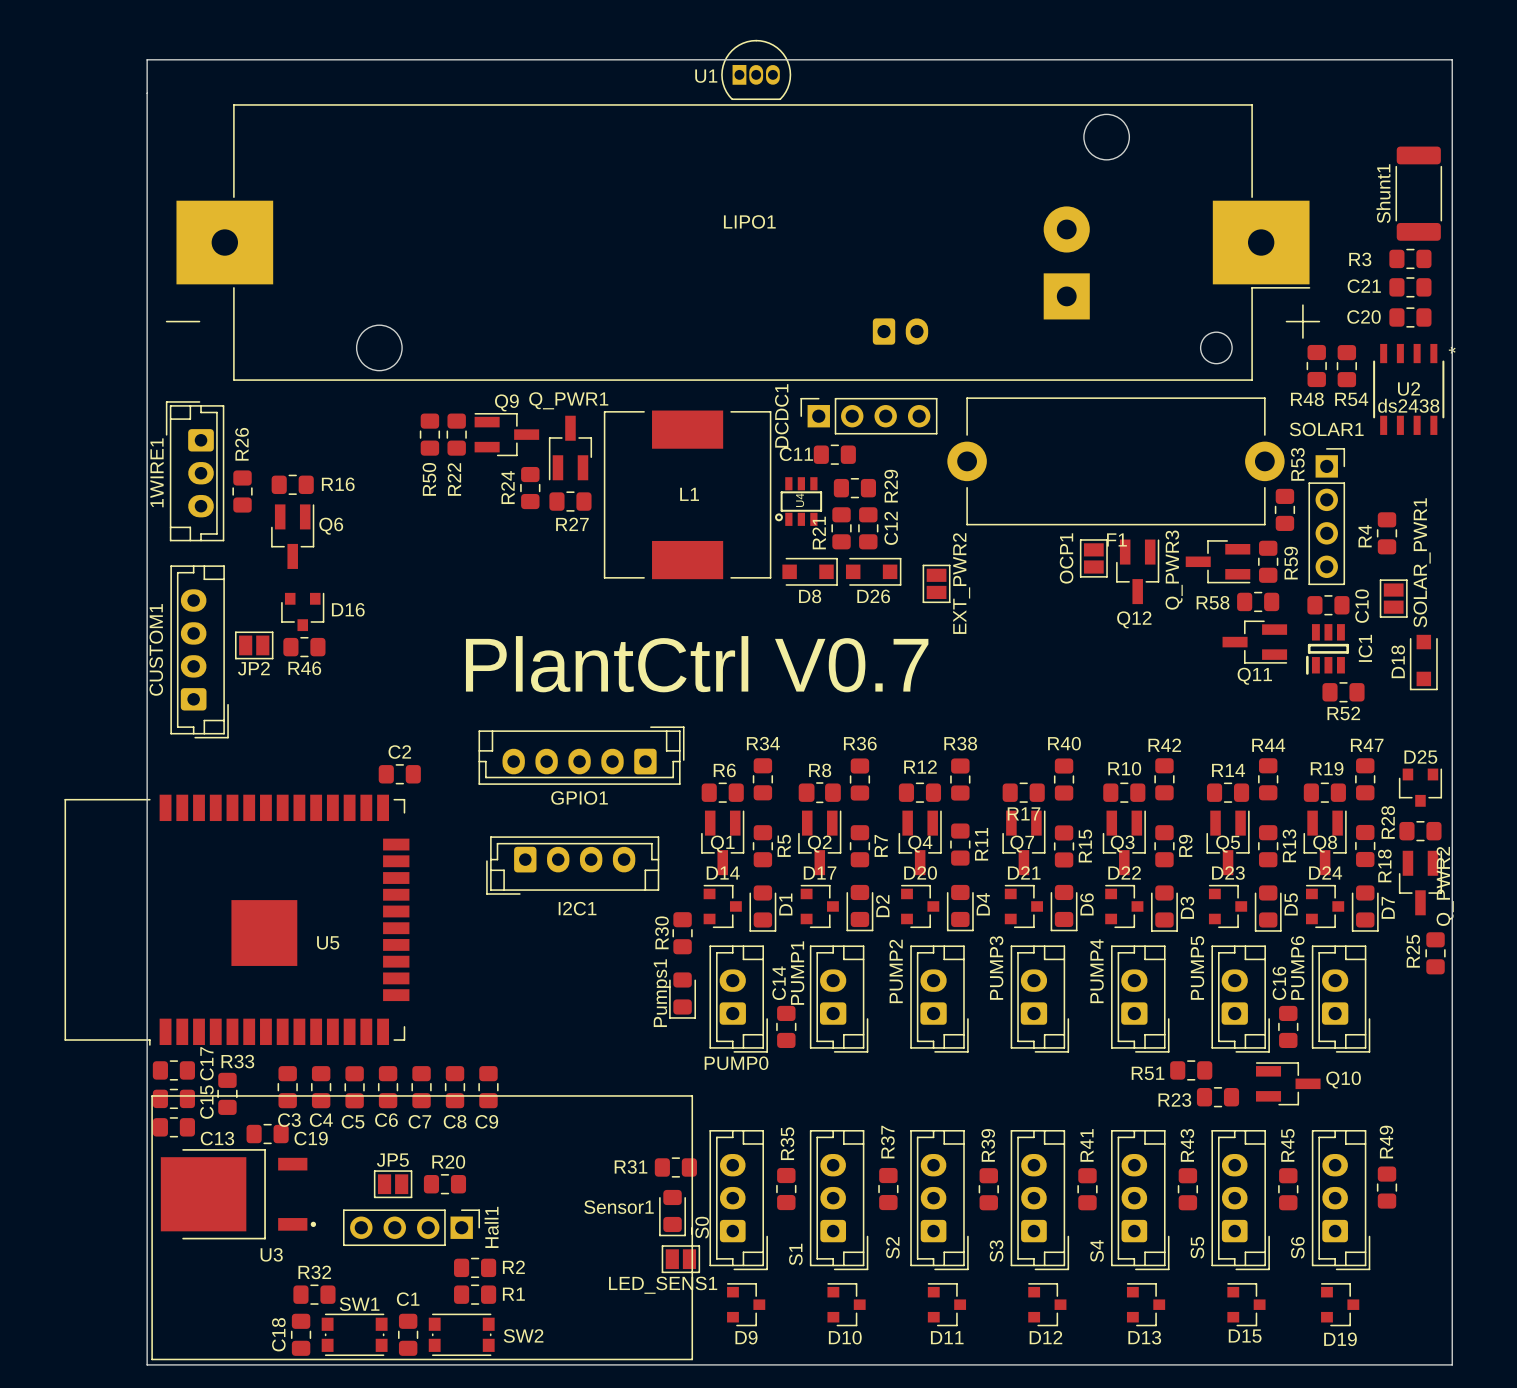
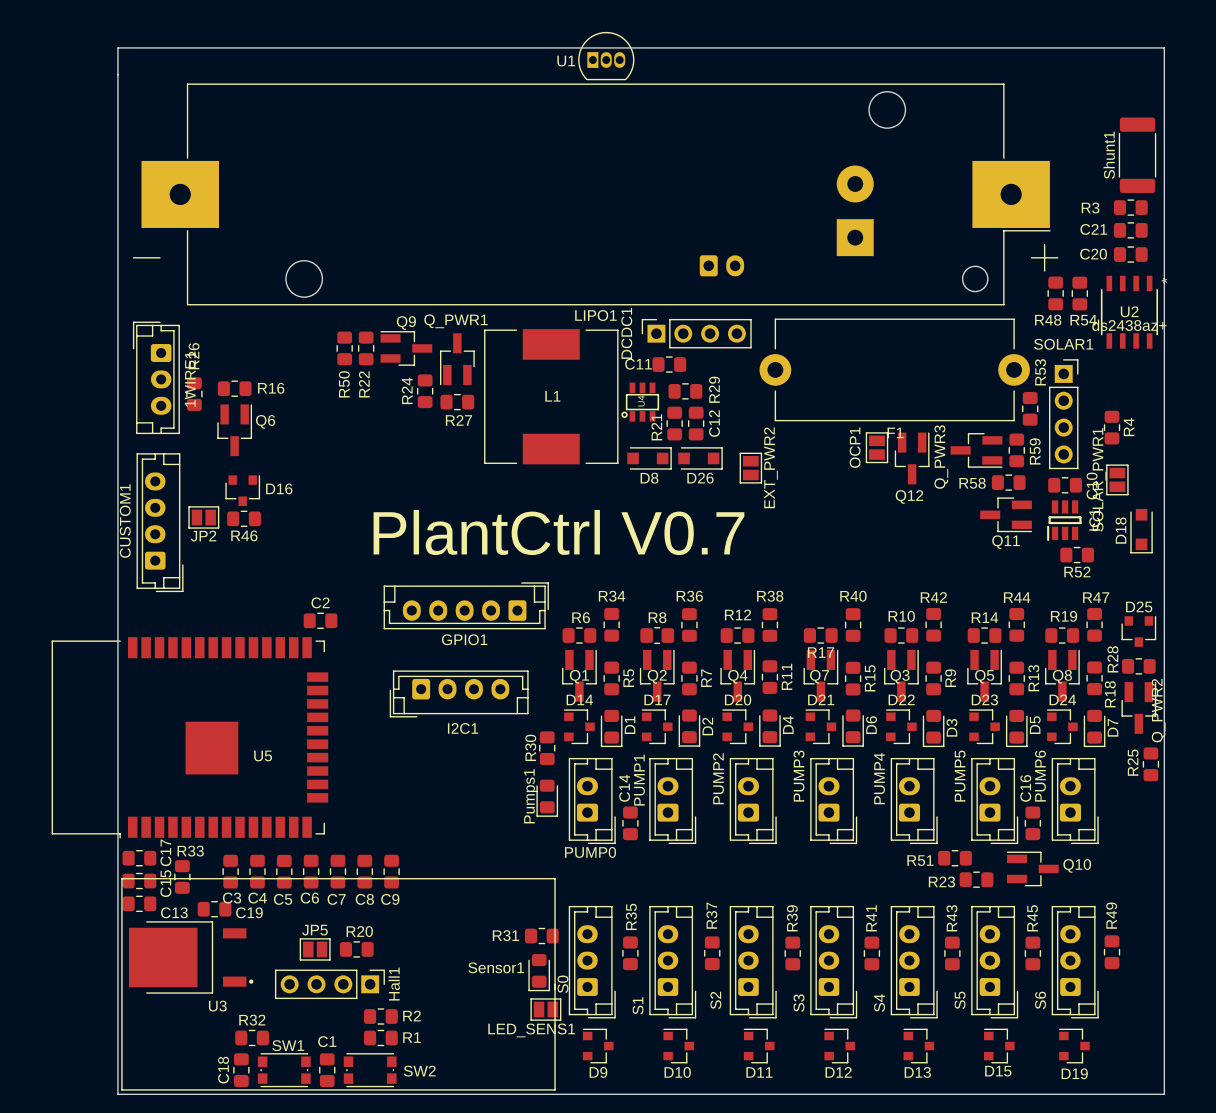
LIPO1 name position: LIPO1 (749, 221) -> LIPO1 (595, 315)
U2 value: ds2438 (1408, 405) -> ds2438az+ (1129, 325)
1WIRE1 name position: 1WIRE1 (157, 472) -> 1WIRE1 (190, 379)
R4 name position: R4 (1365, 536) -> R4 (1129, 427)
SOLAR_PWR1 name position: SOLAR_PWR1 (1422, 562) -> SOLAR_PWR1 (1099, 479)

